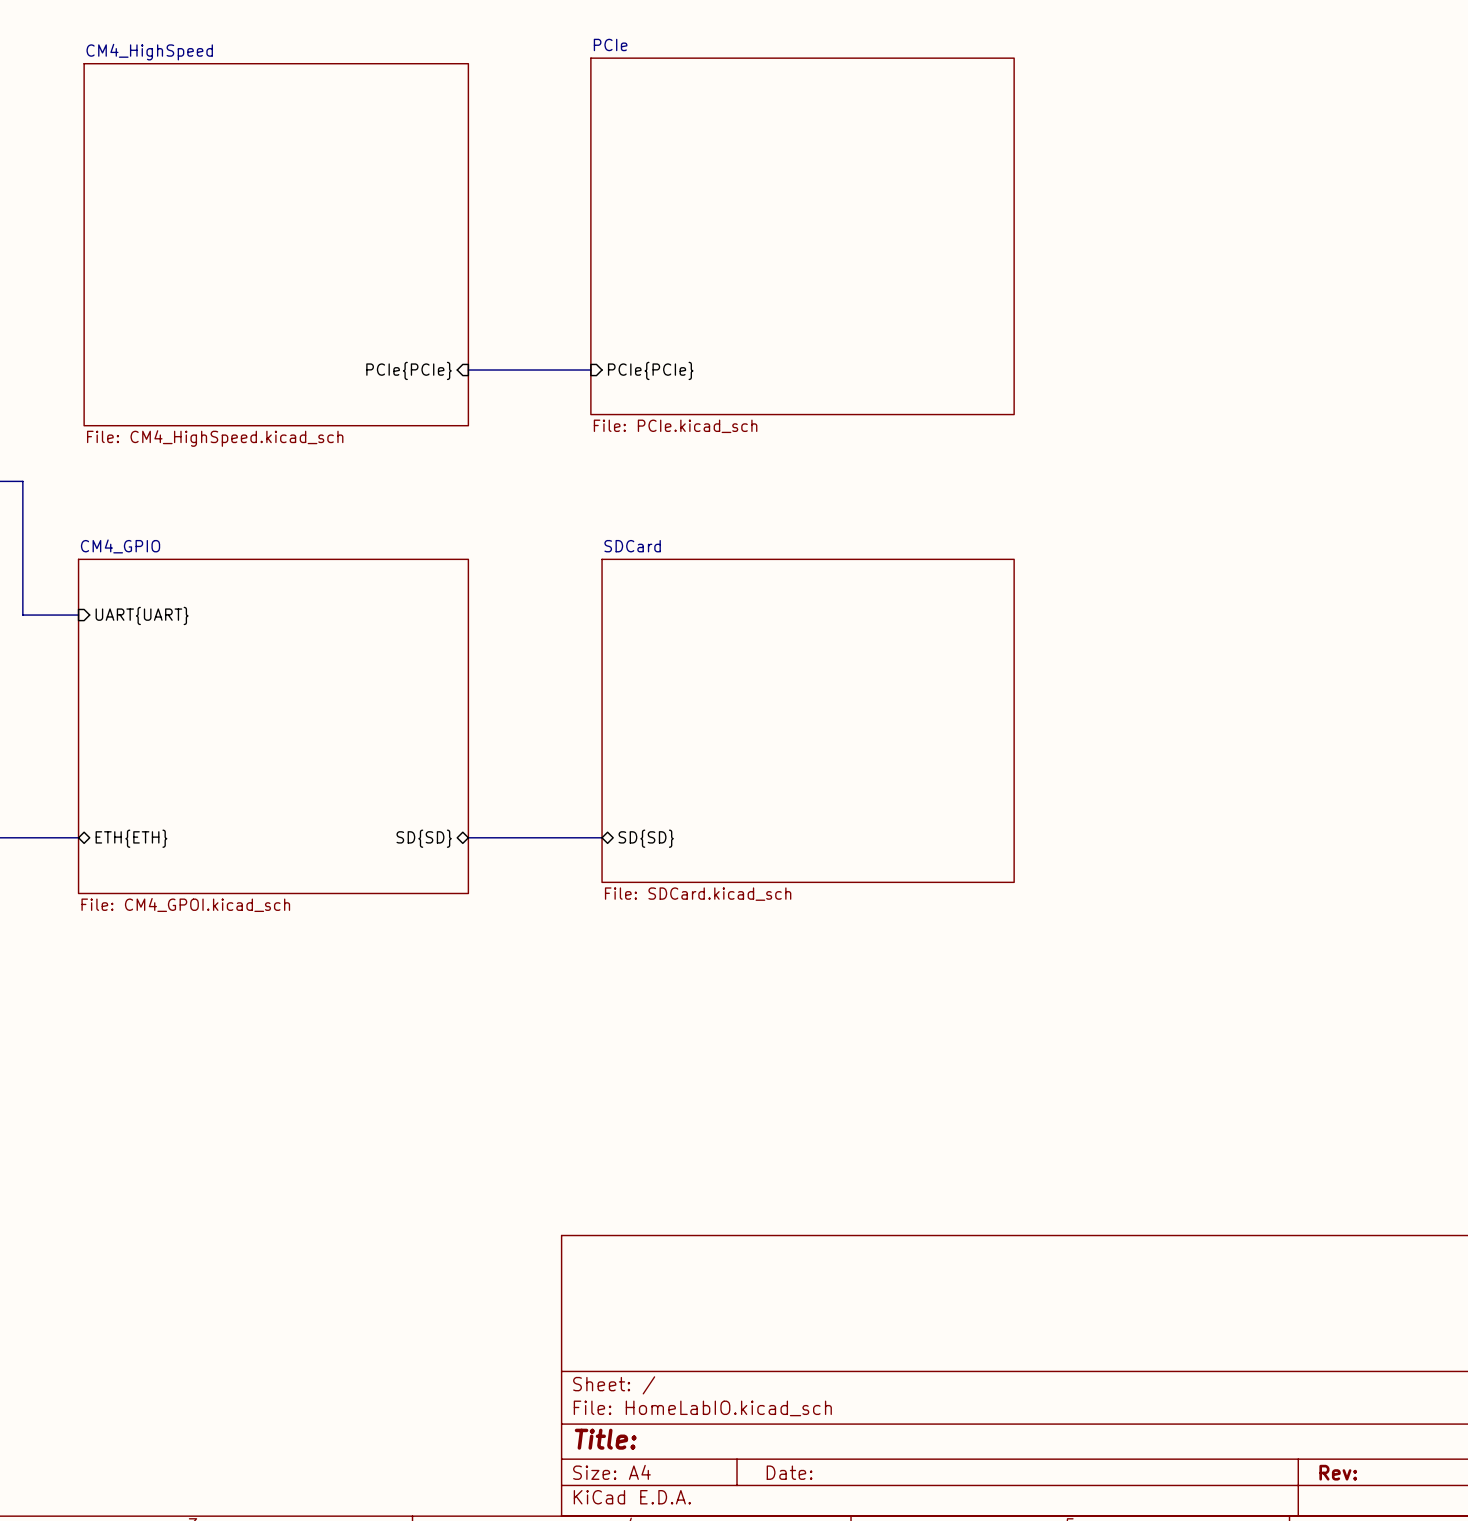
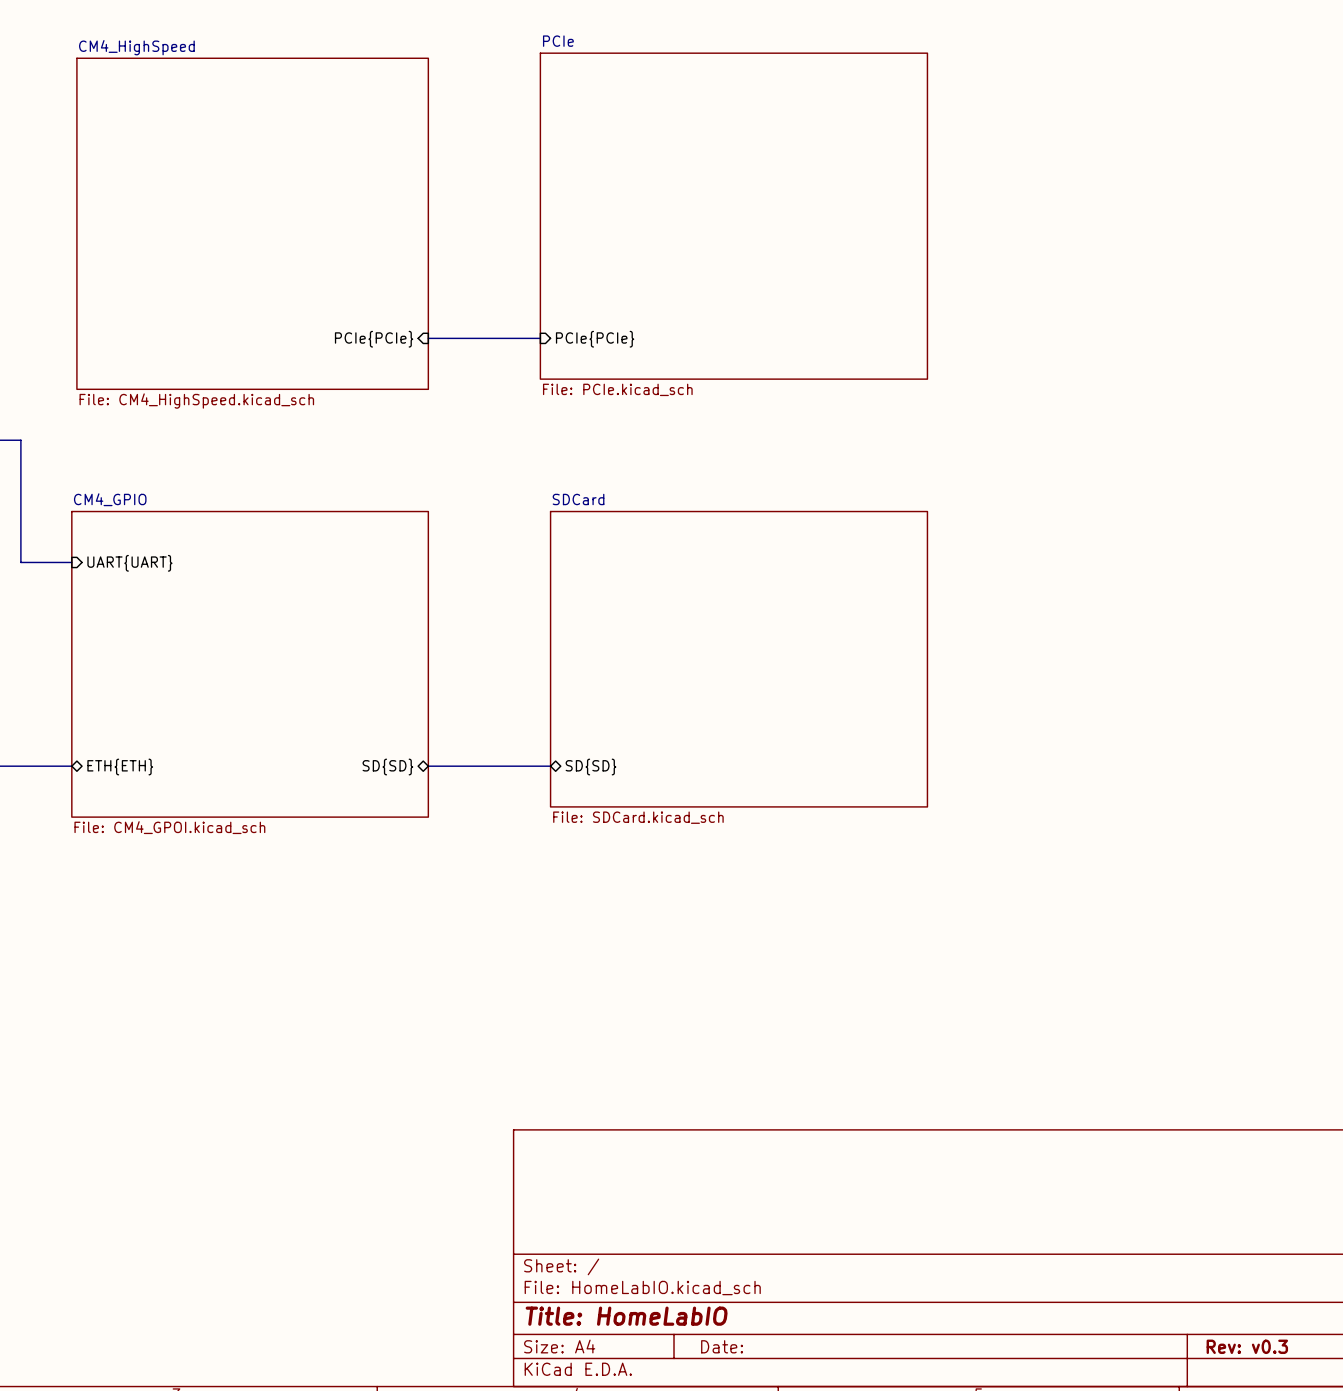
title block: Title: (605, 1439) -> Title: HomeLabIO (626, 1316)
title block: Rev: (1338, 1472) -> Rev: v0.3 (1247, 1346)

